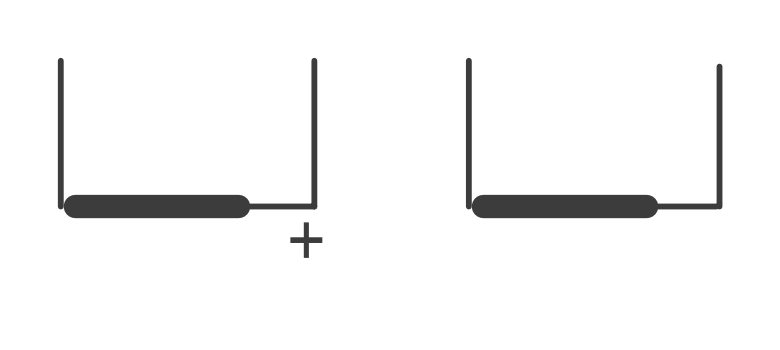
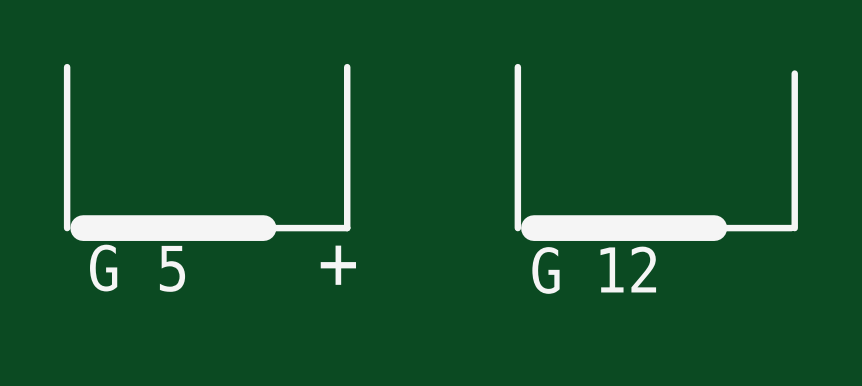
text: none -> G (103, 268)
text: none -> 5 (172, 268)
text: none -> G (545, 270)
text: none -> 12 (628, 269)

